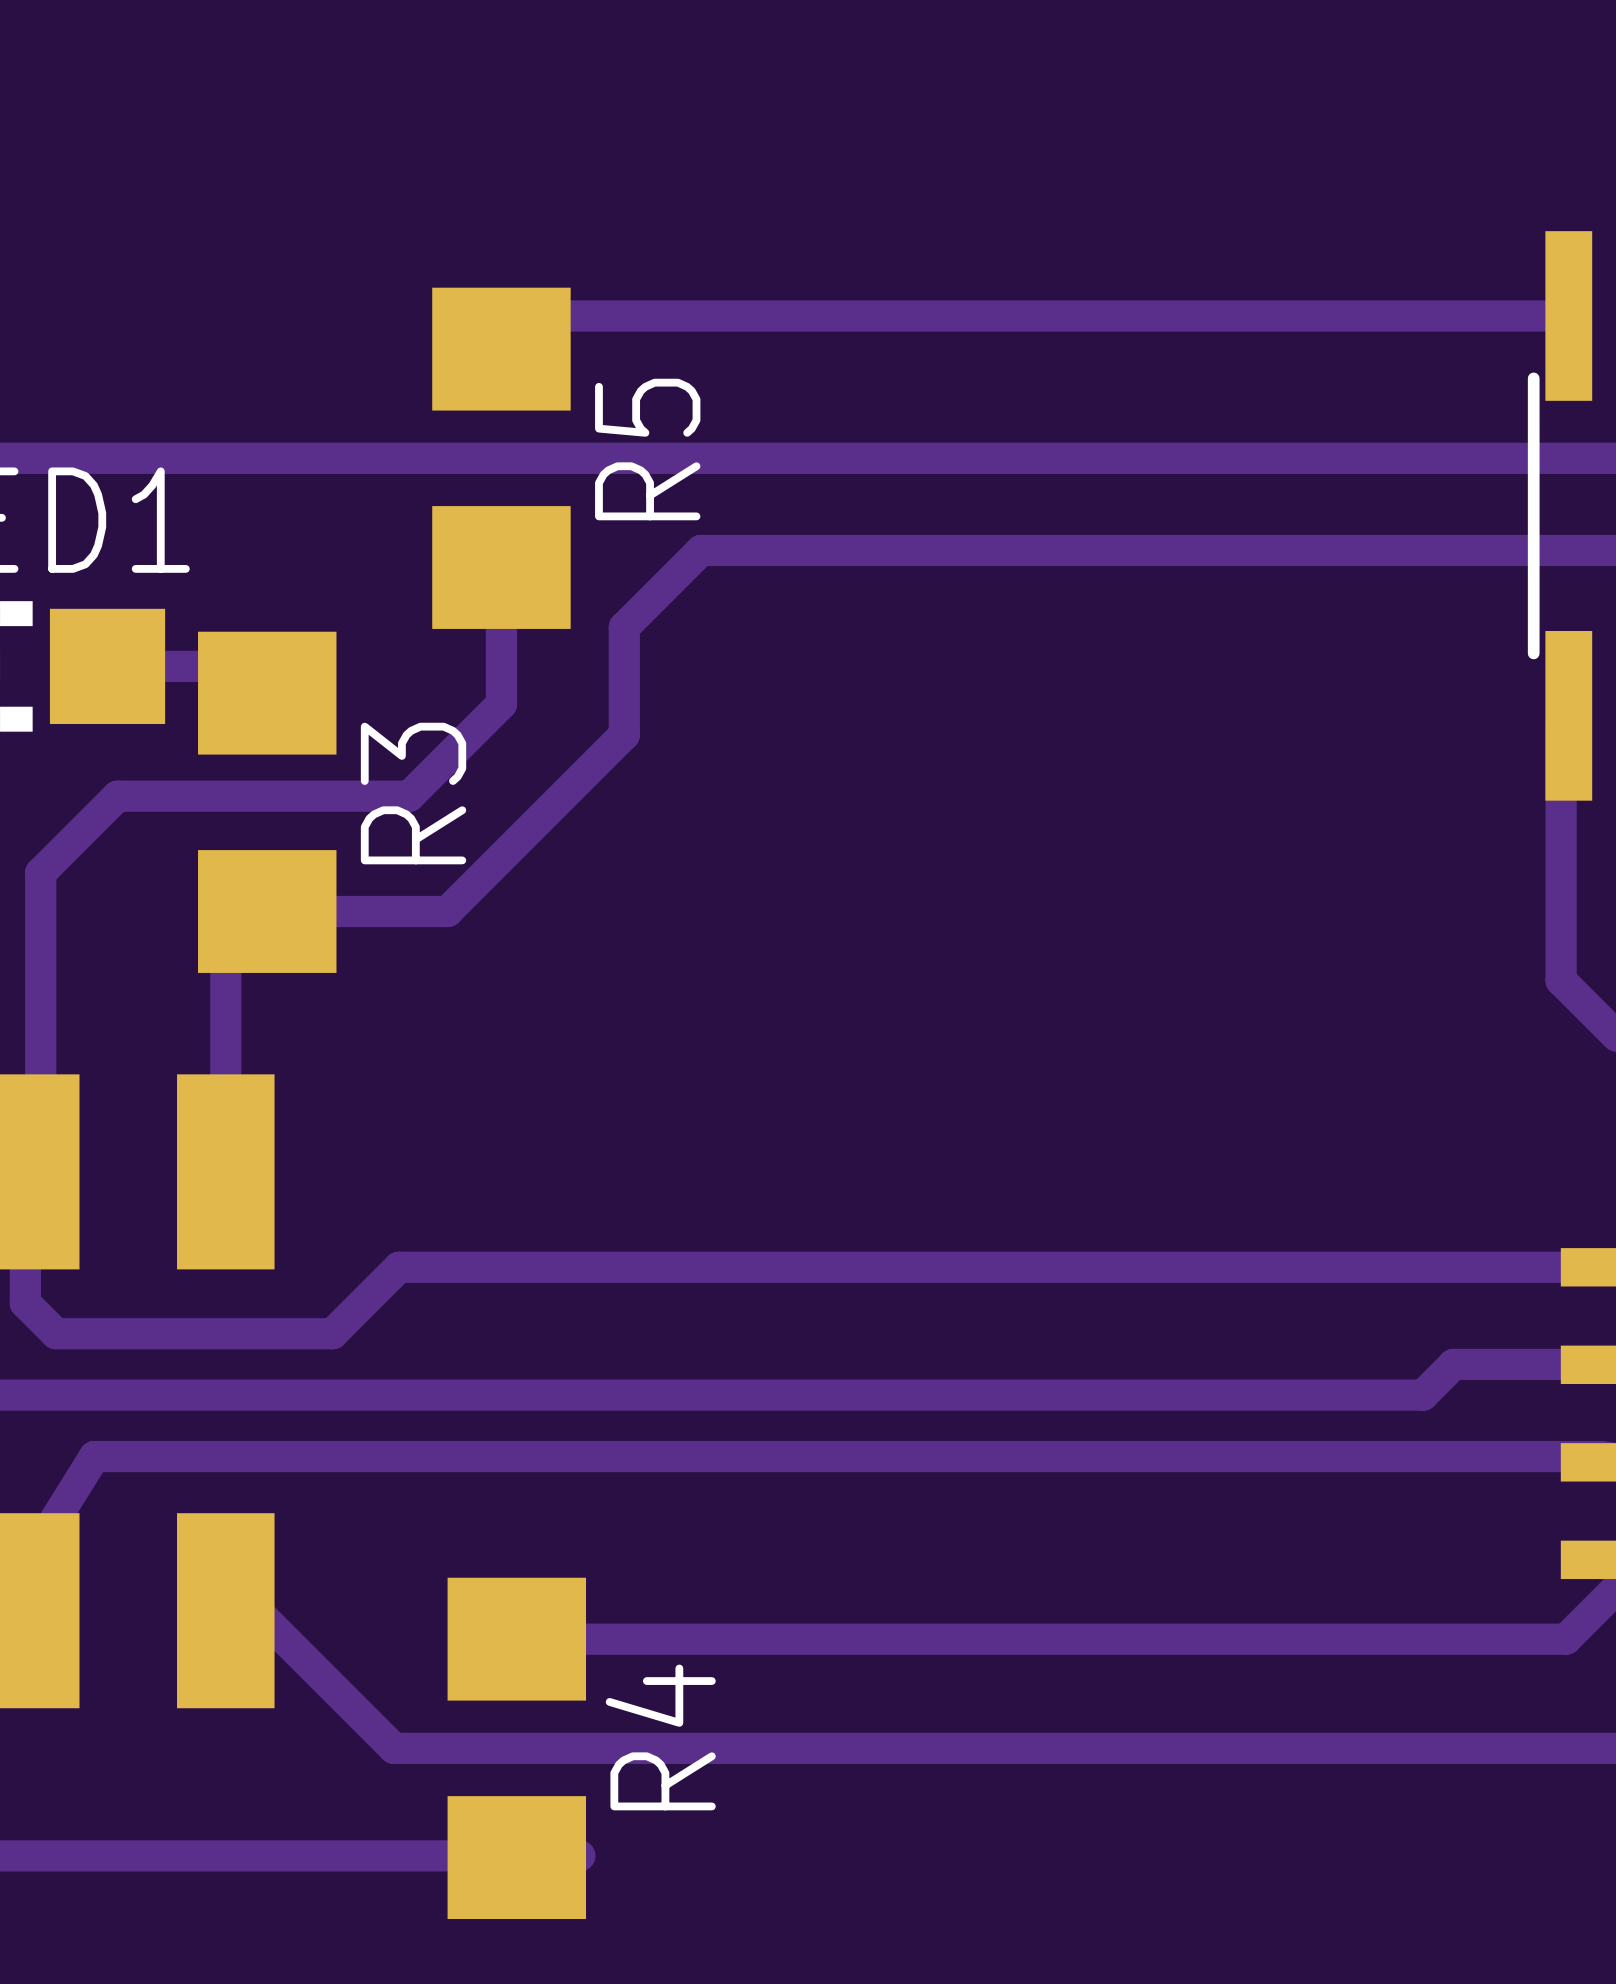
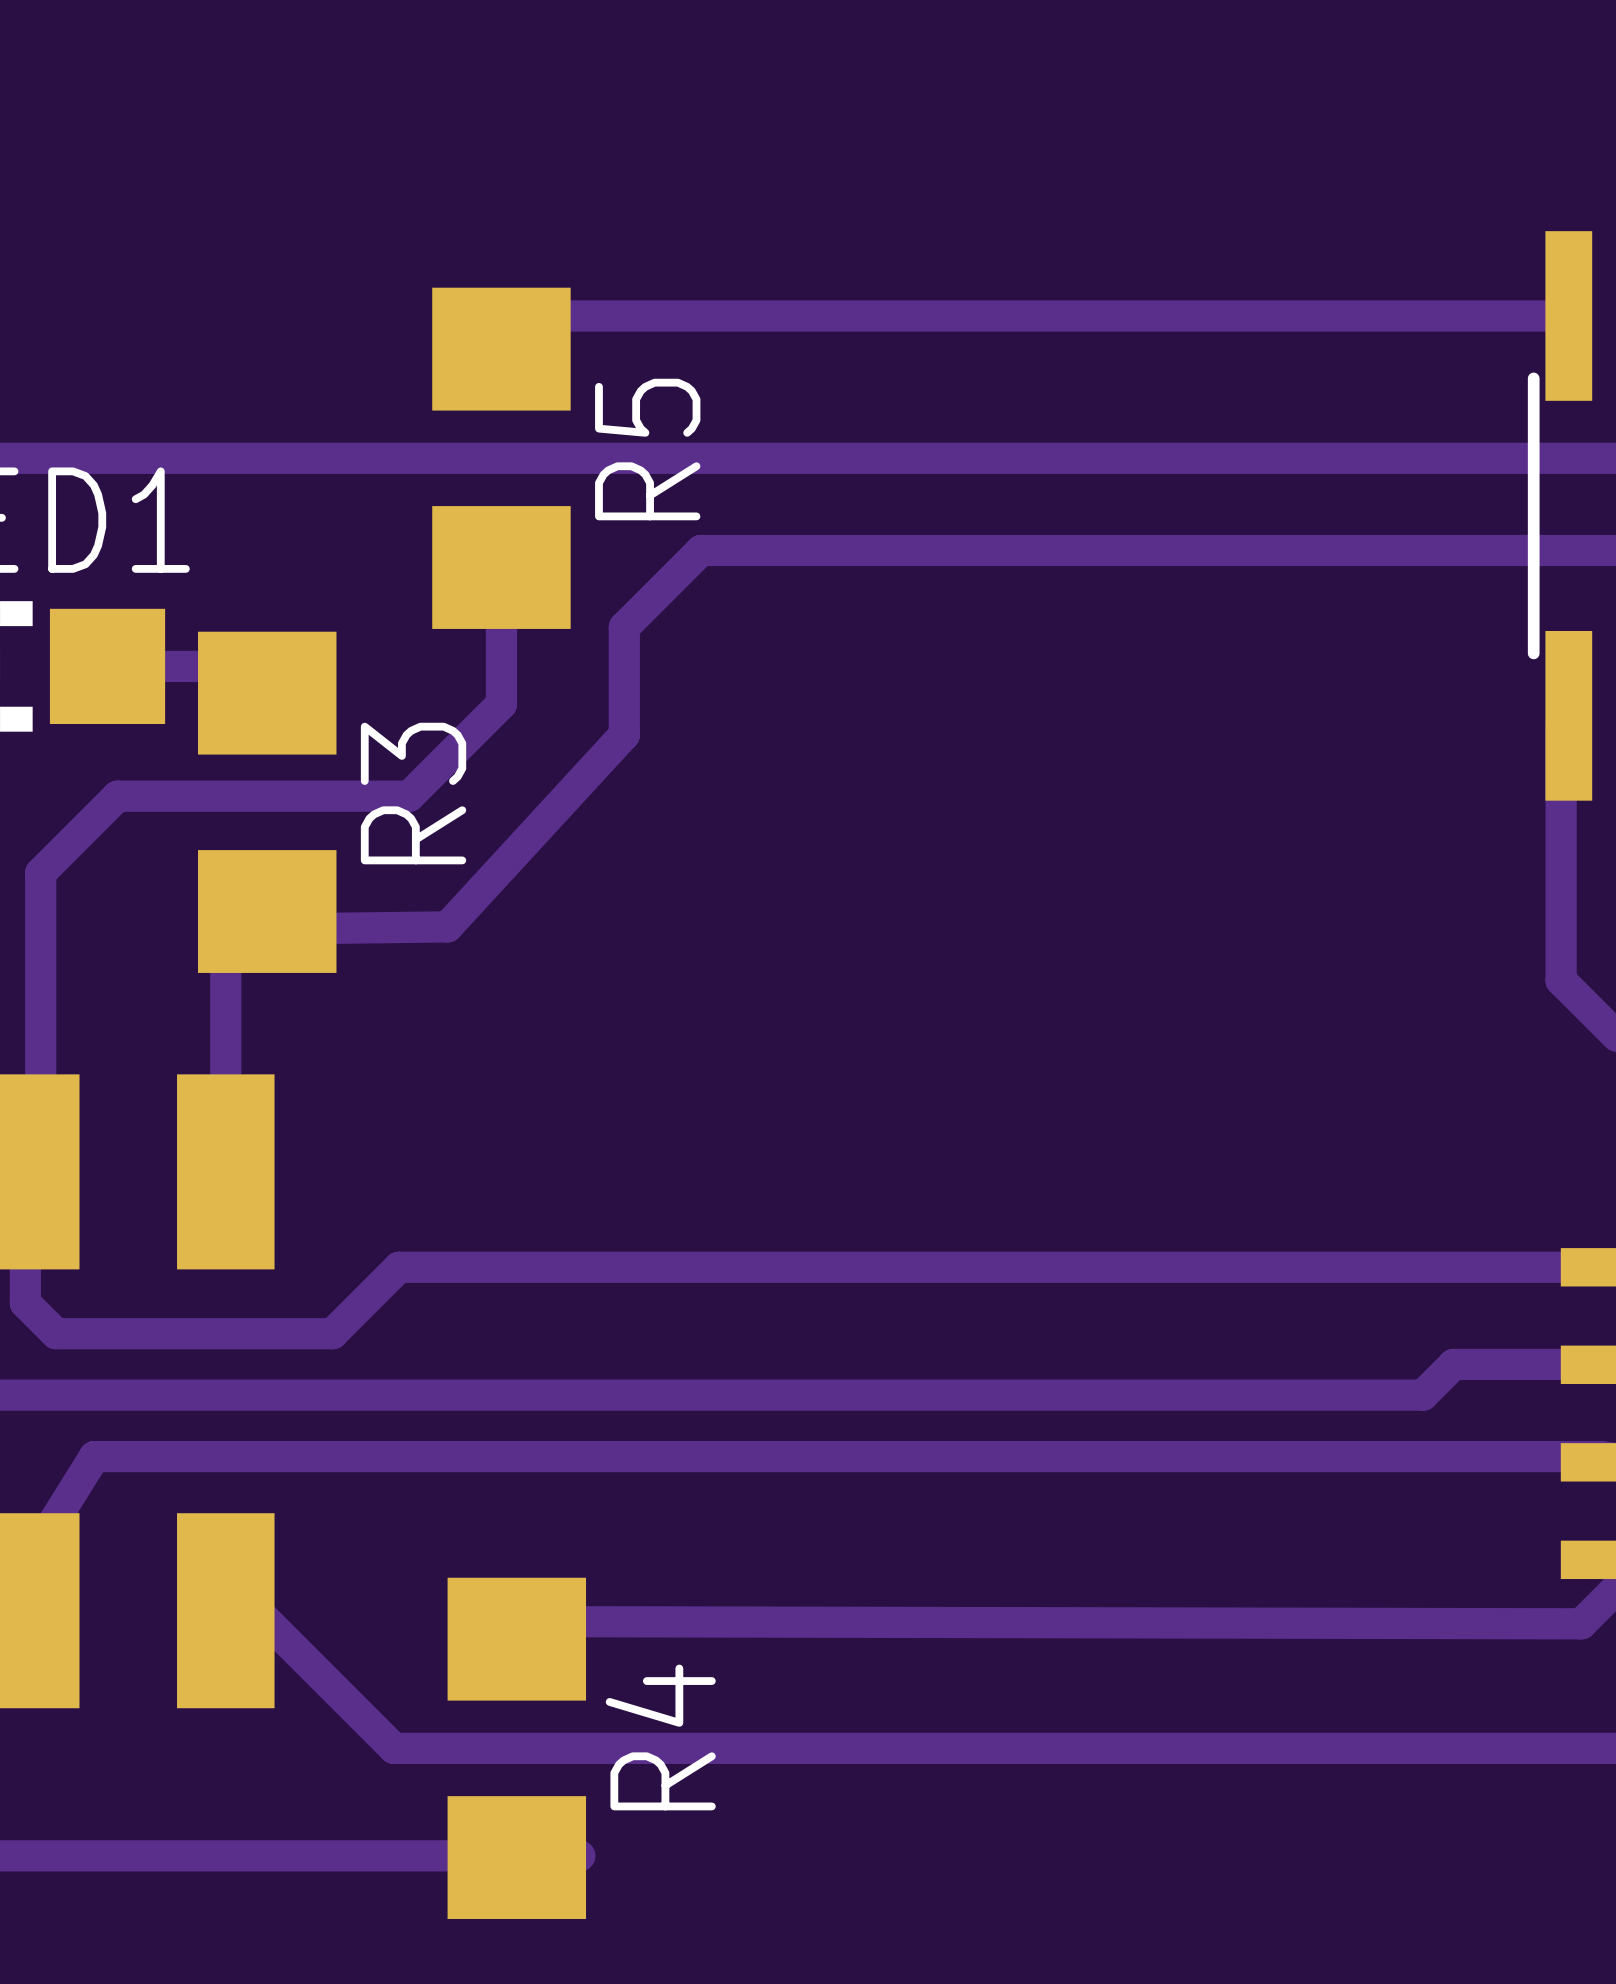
track: (624, 734) (447, 911) (267, 911) (225, 952) -> (624, 734) (447, 926) (267, 929) (225, 952)
track: (1581, 1623) (1565, 1639) (516, 1639) -> (1581, 1623) (516, 1621)

